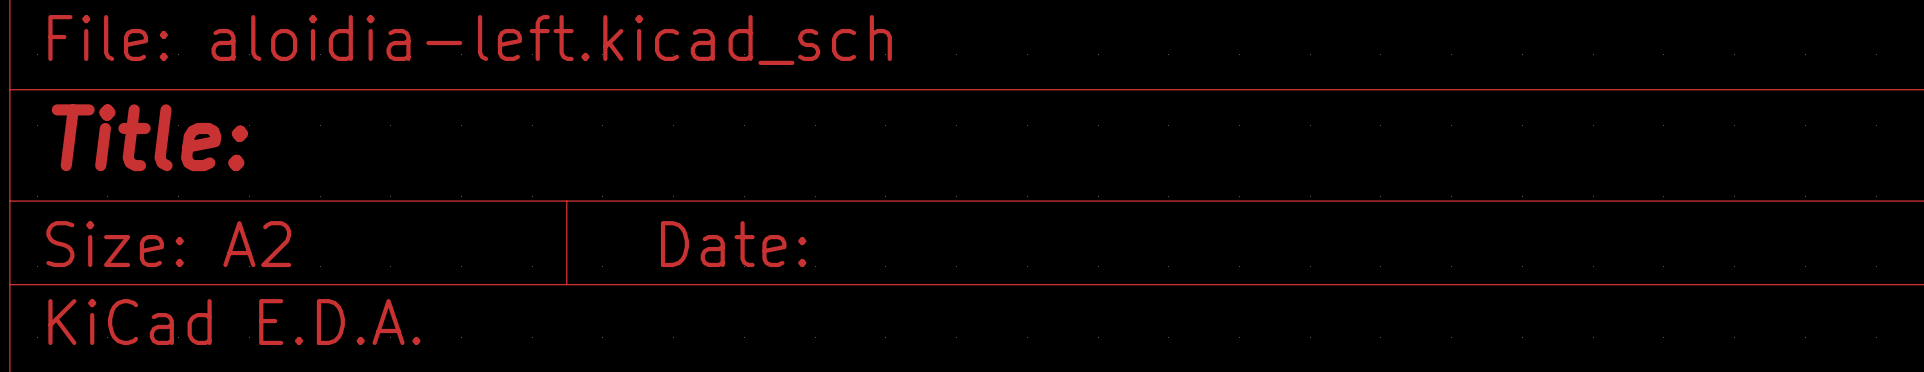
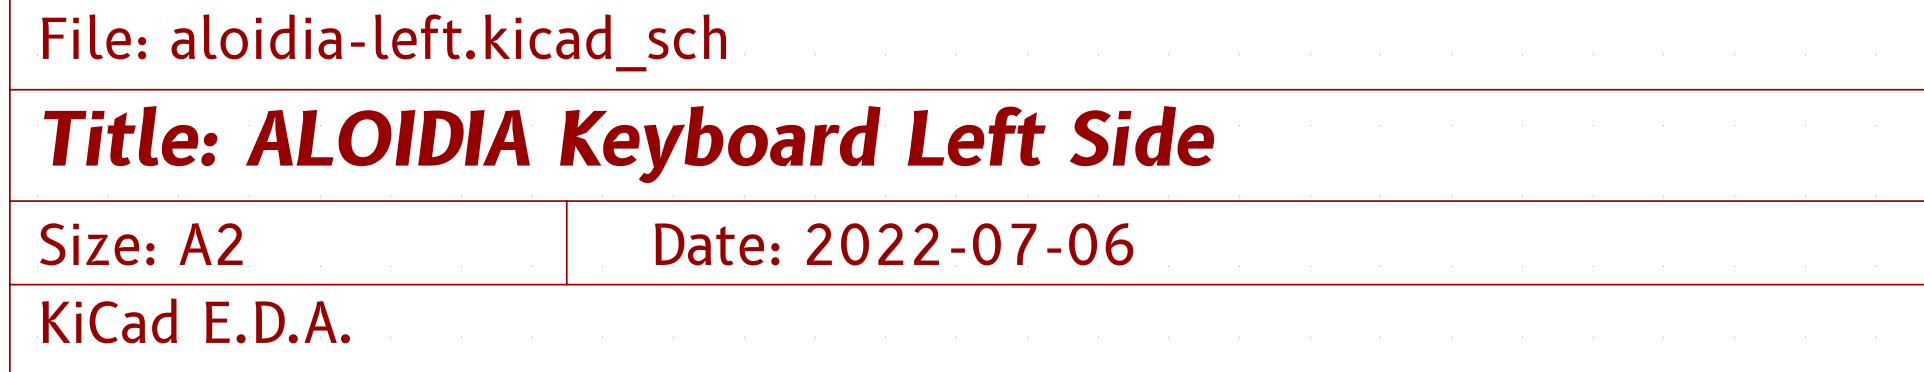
title block: Title: (149, 137) -> Title: ALOIDIA Keyboard Left Side (629, 144)
title block: Date: (733, 244) -> Date: 2022-07-06 (894, 244)

